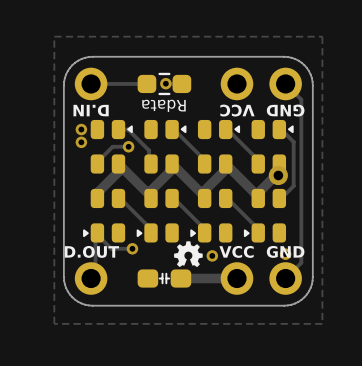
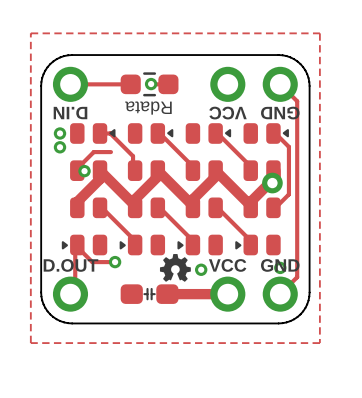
via position: (128, 146) -> (84, 171)

